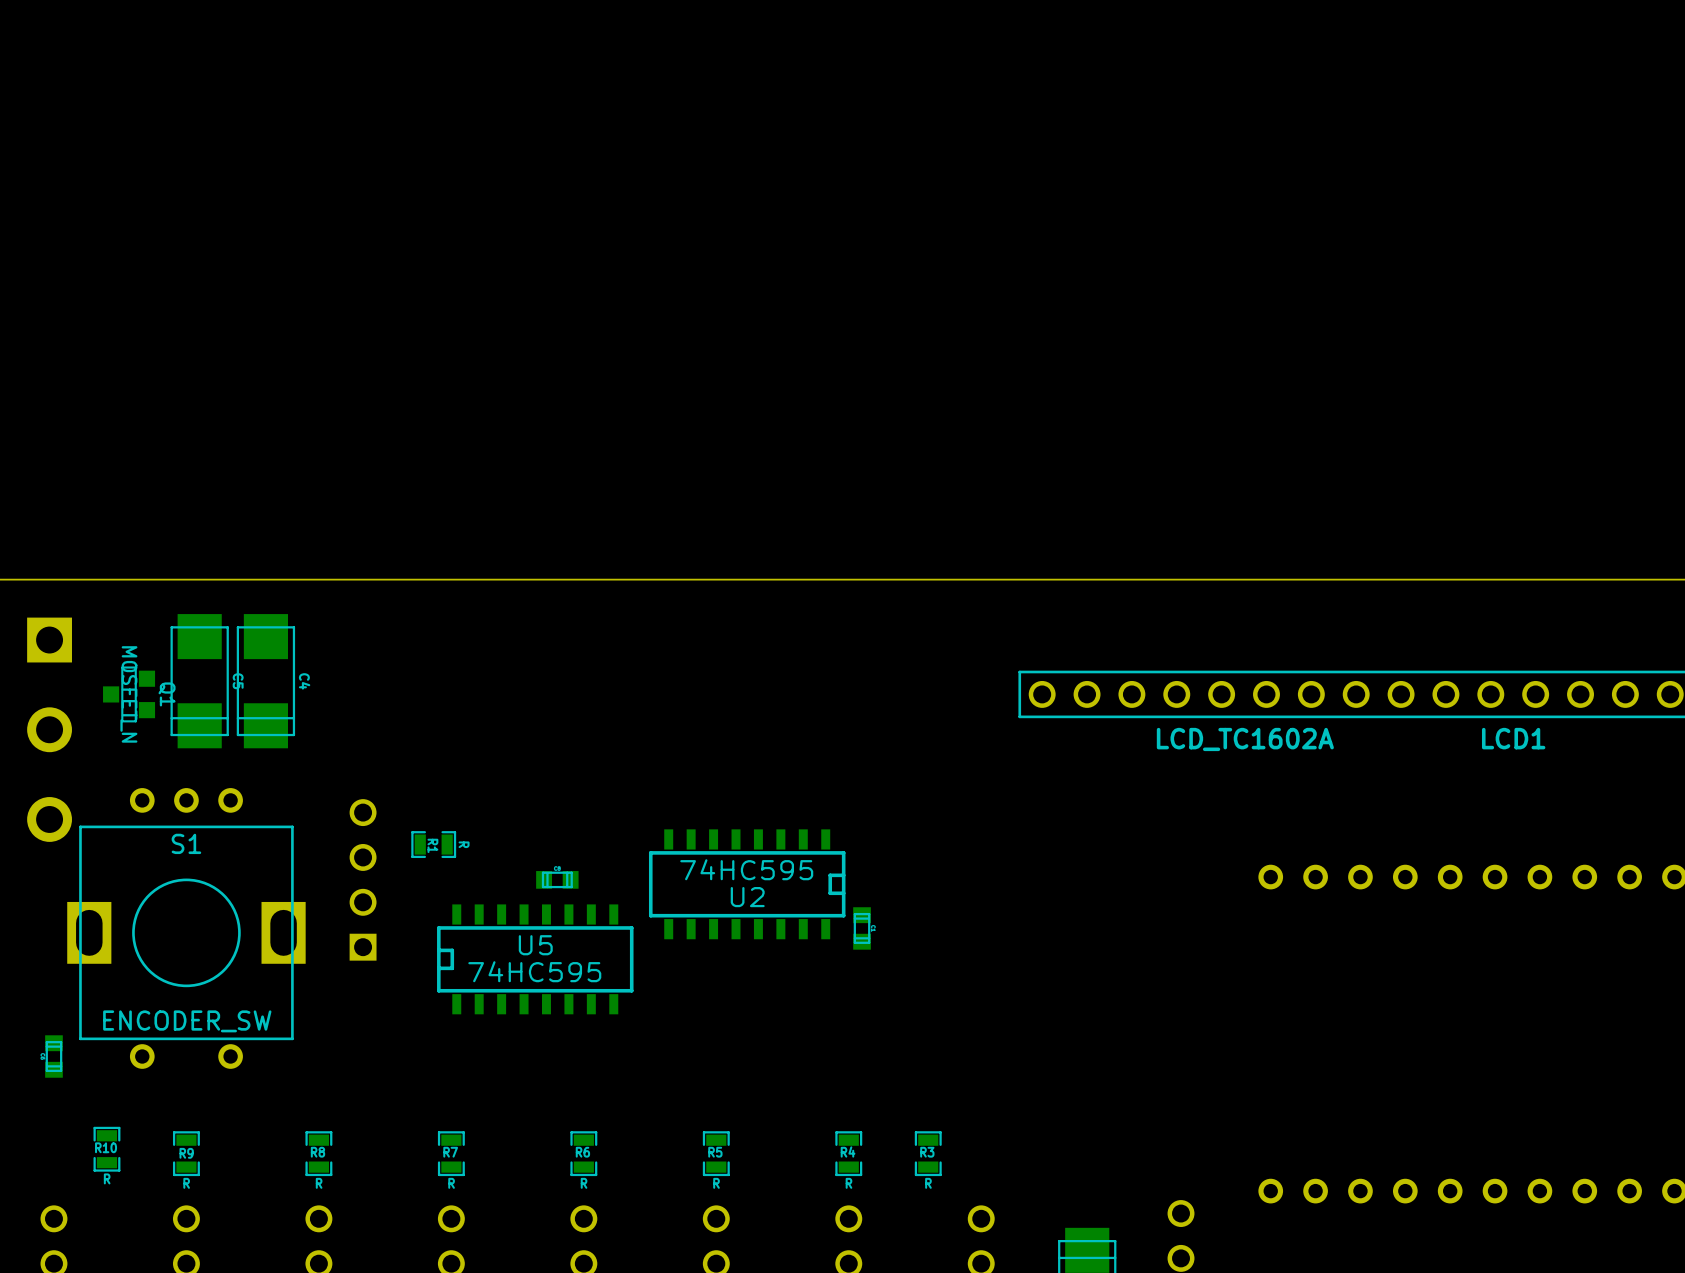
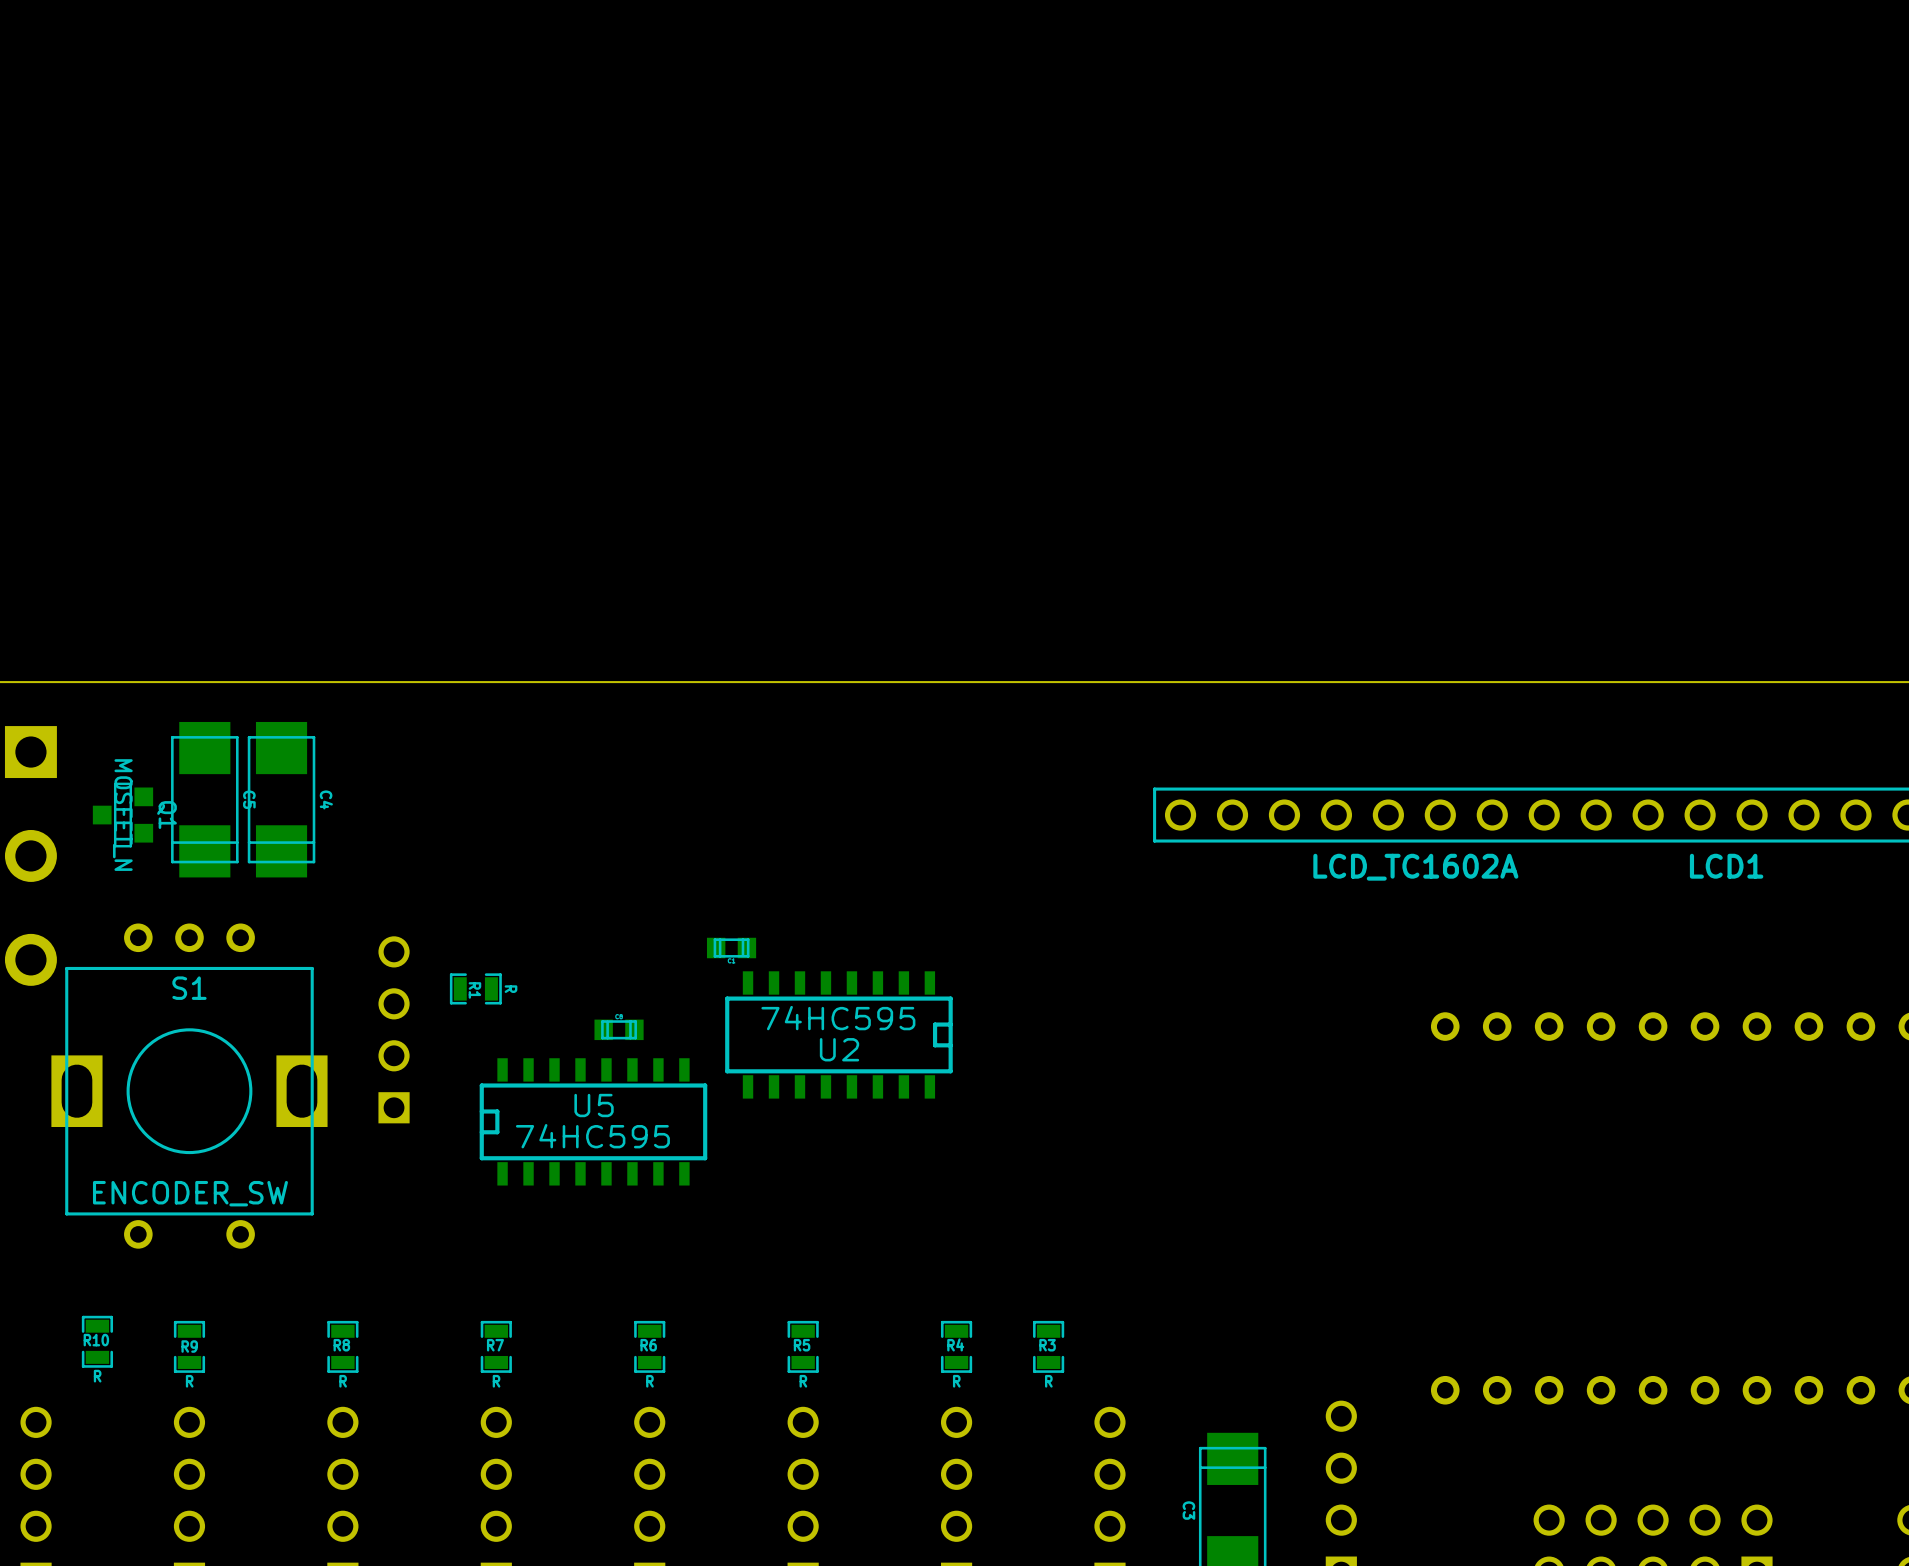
part rotation: 0° (862, 928) -> 90° clockwise (731, 948)
part position: (862, 928) -> (731, 948)
part: (53, 1056) -> none

